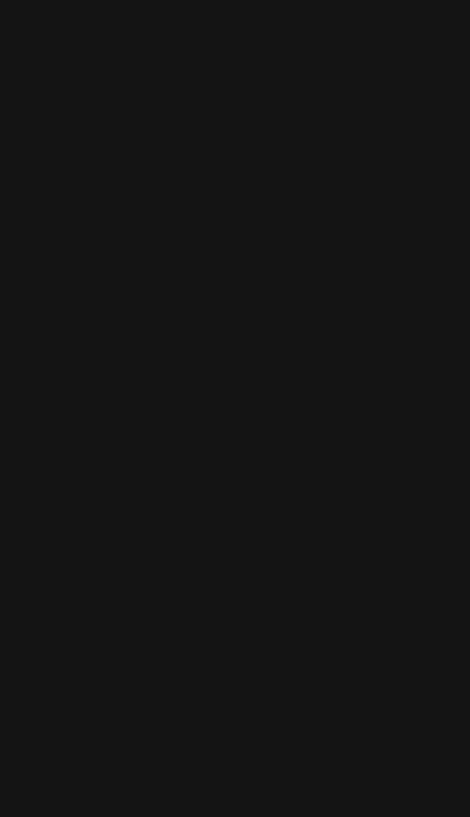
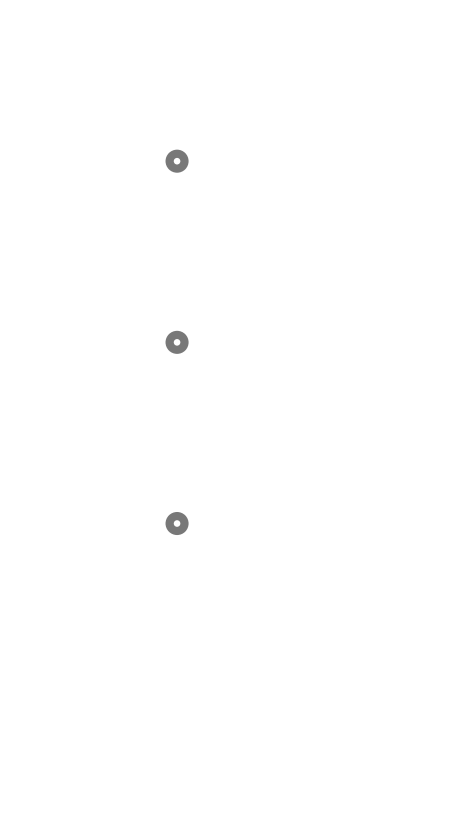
via: none -> (177, 161)
via: none -> (177, 342)
via: none -> (177, 523)

